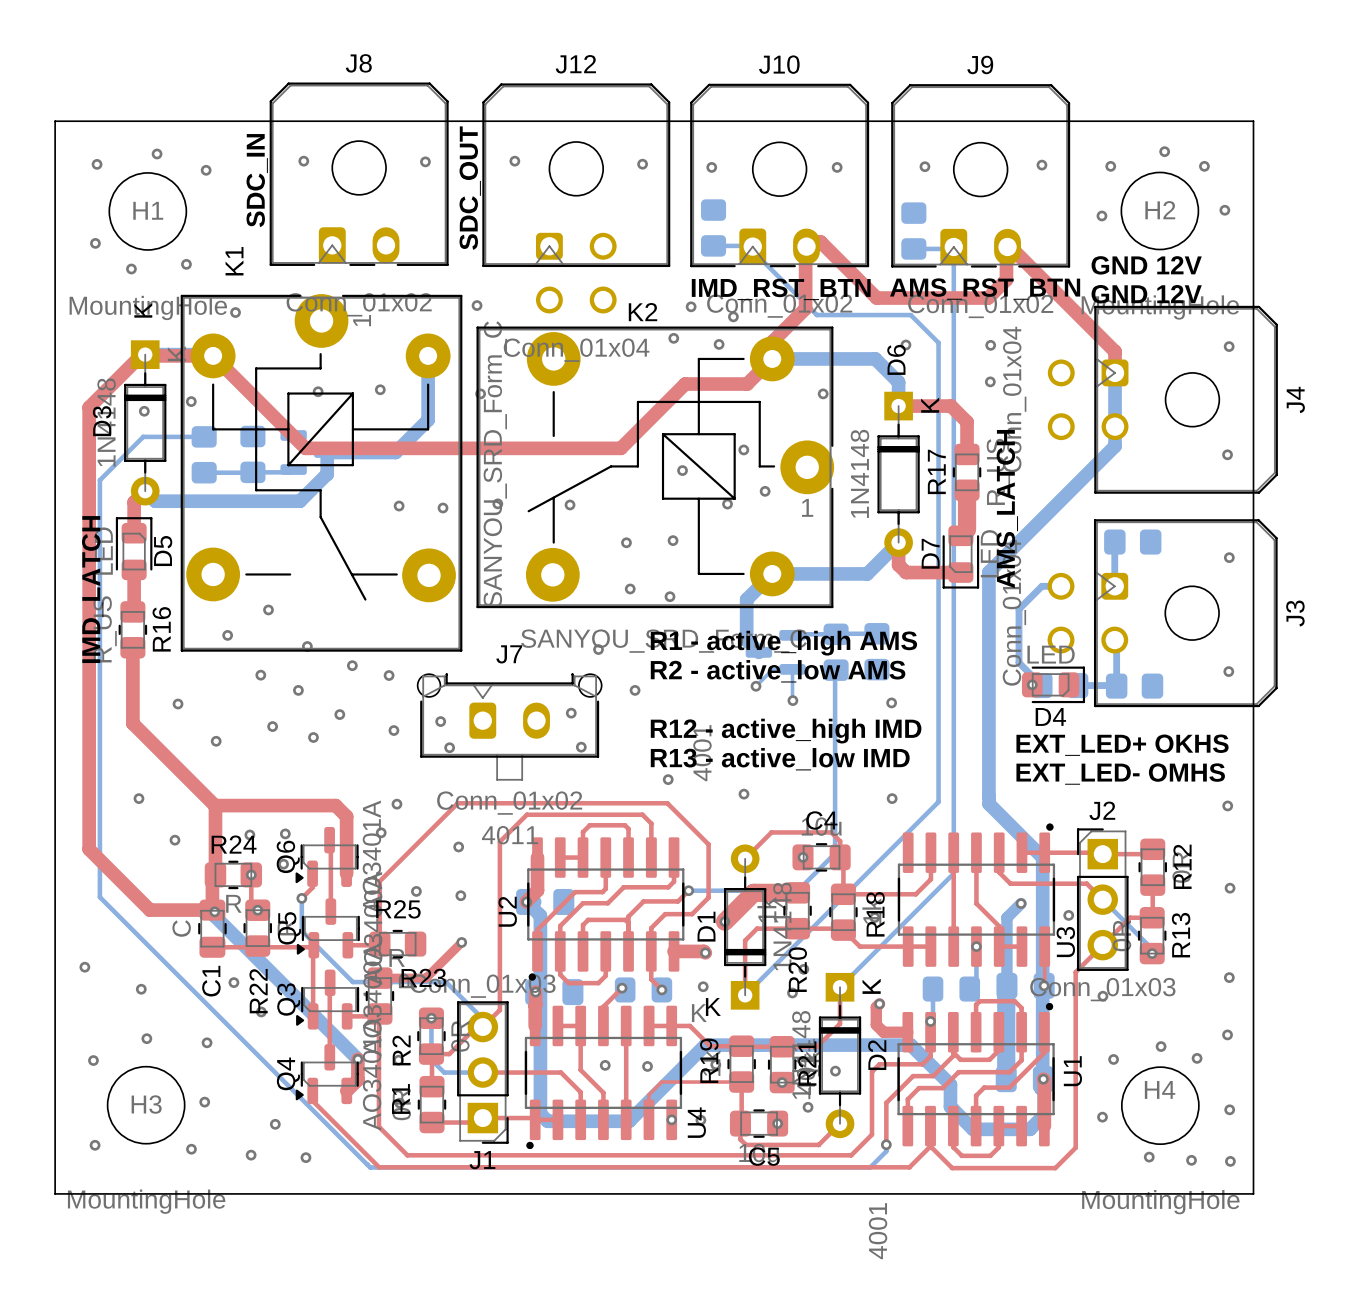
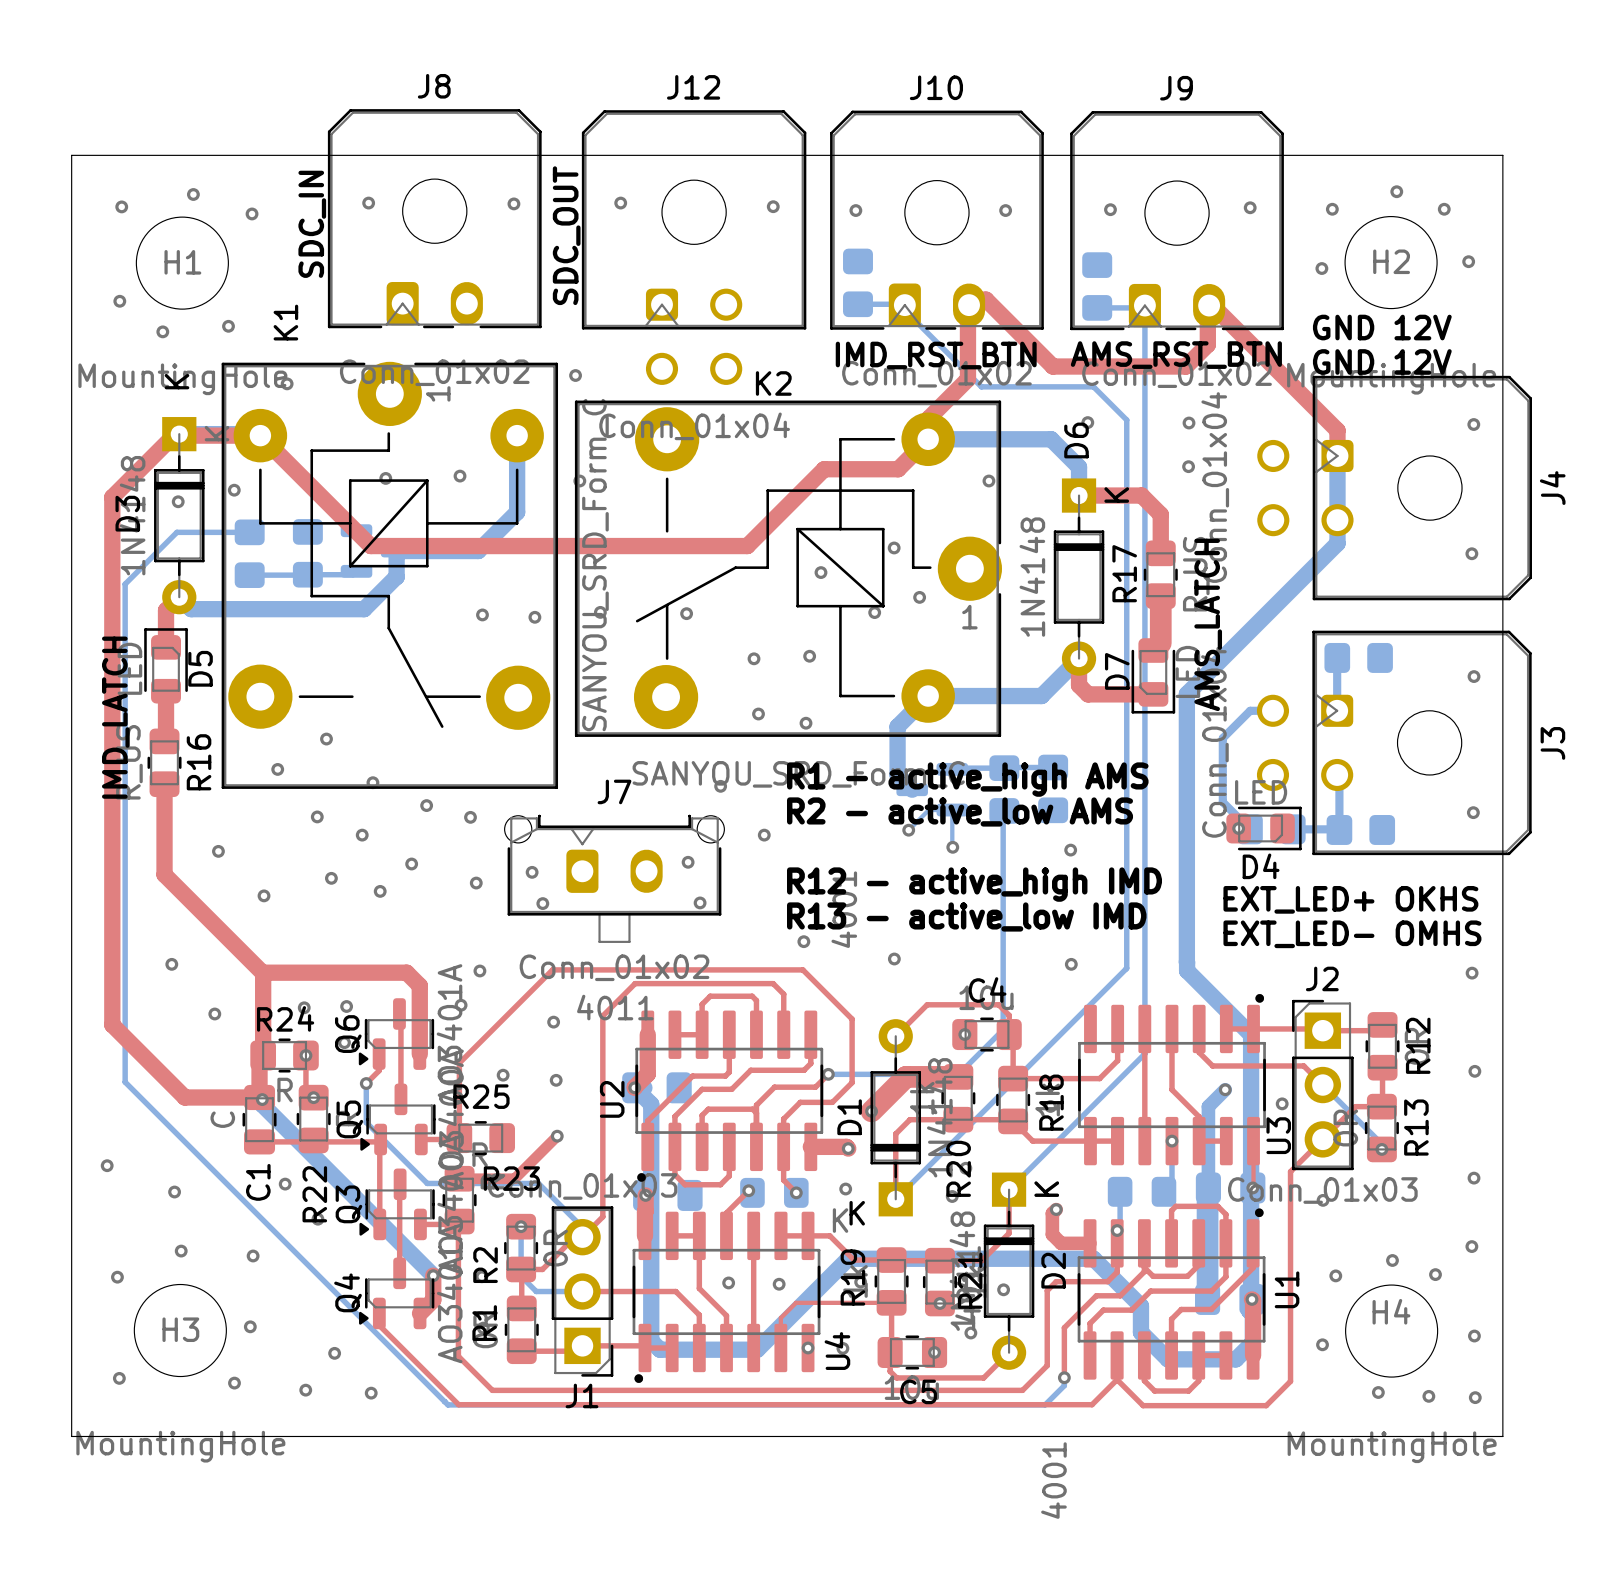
via: (691, 306) -> none
via: (733, 316) -> none
via: (673, 338) -> none
via: (719, 344) -> none

